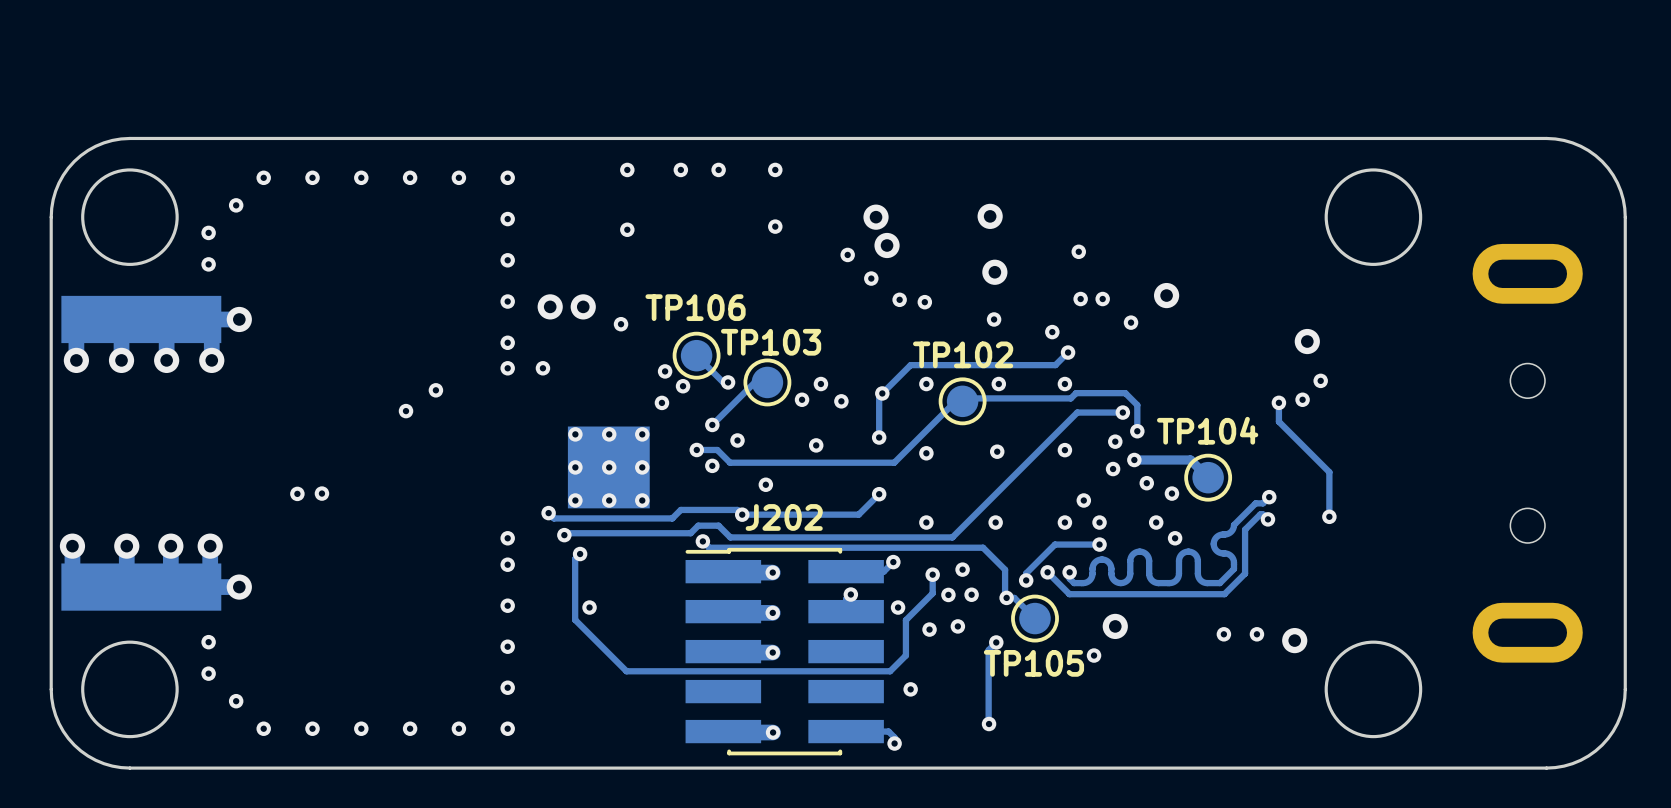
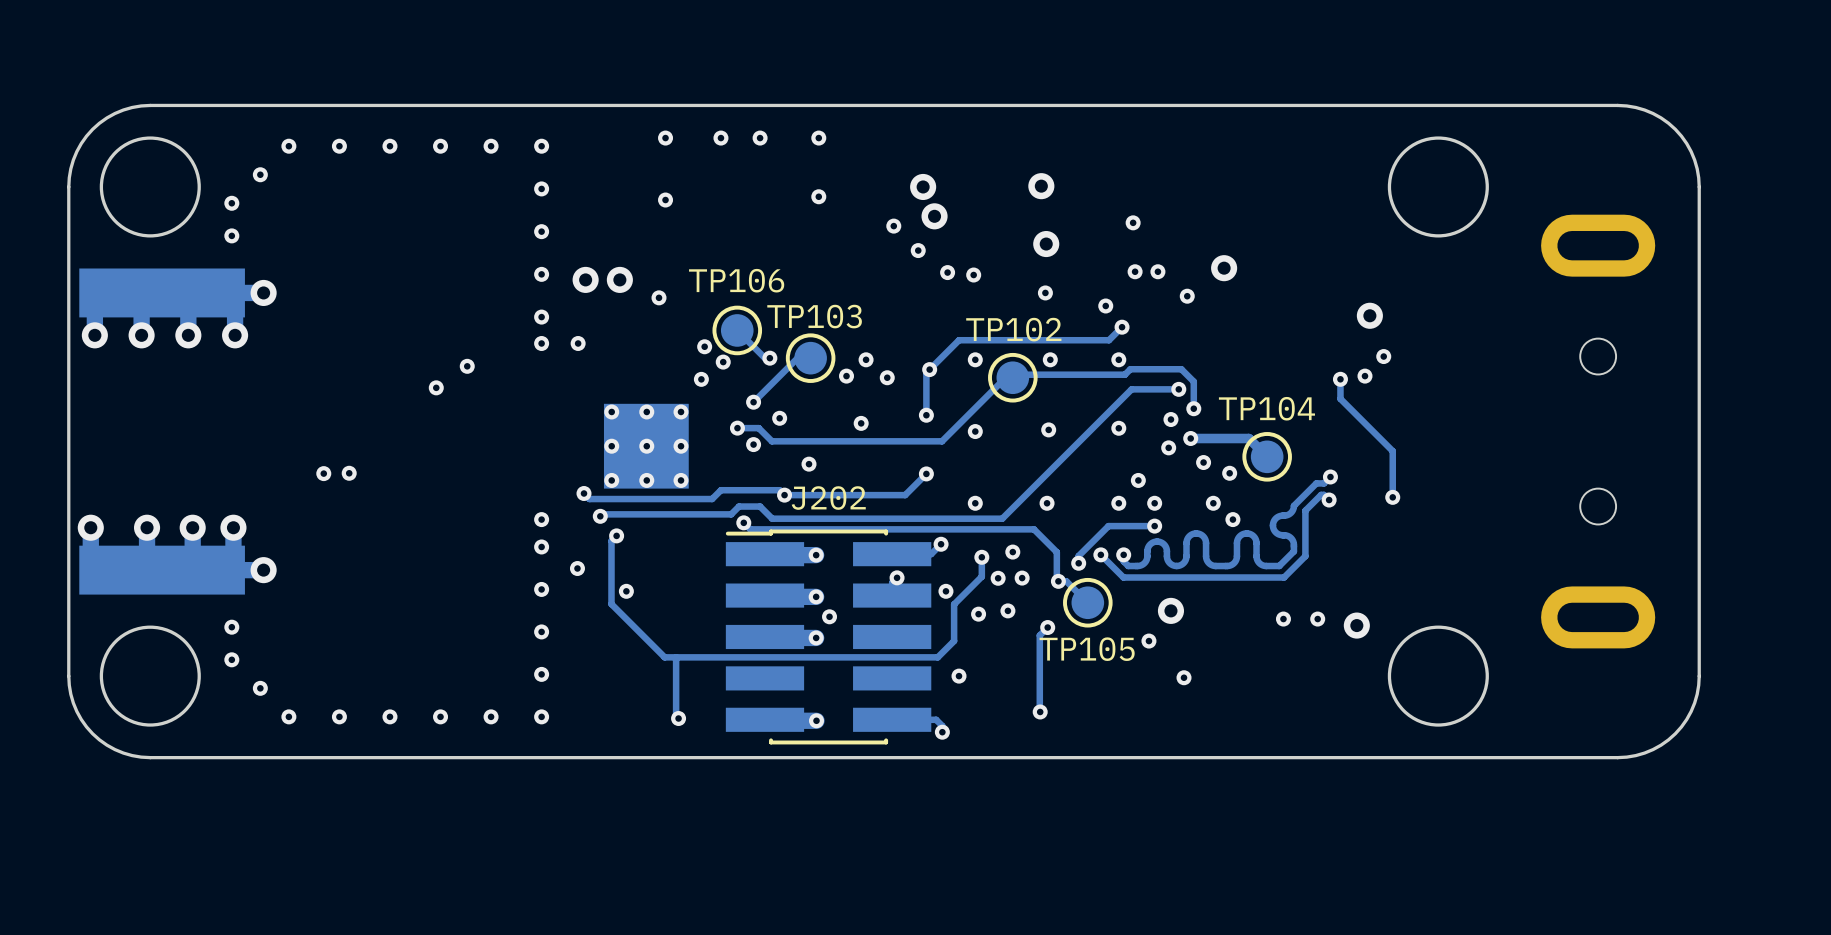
via: none -> (577, 568)
via: none -> (829, 616)
track: none -> (676, 657) (676, 716) (678, 718)
via: none -> (1184, 677)
via: none -> (678, 718)

